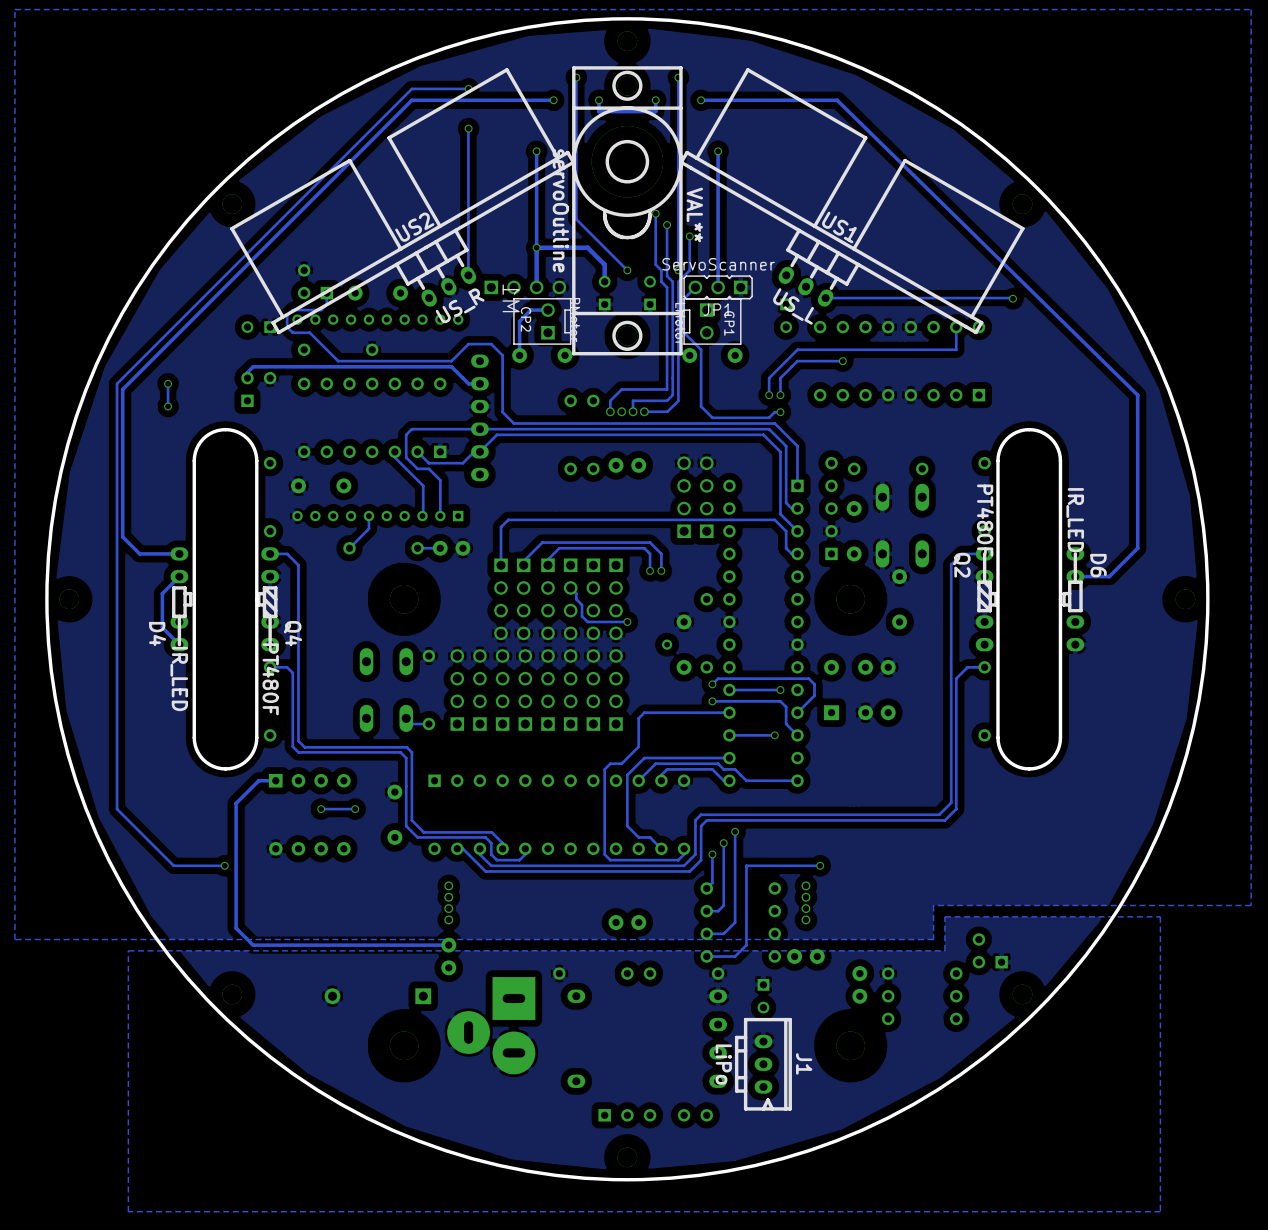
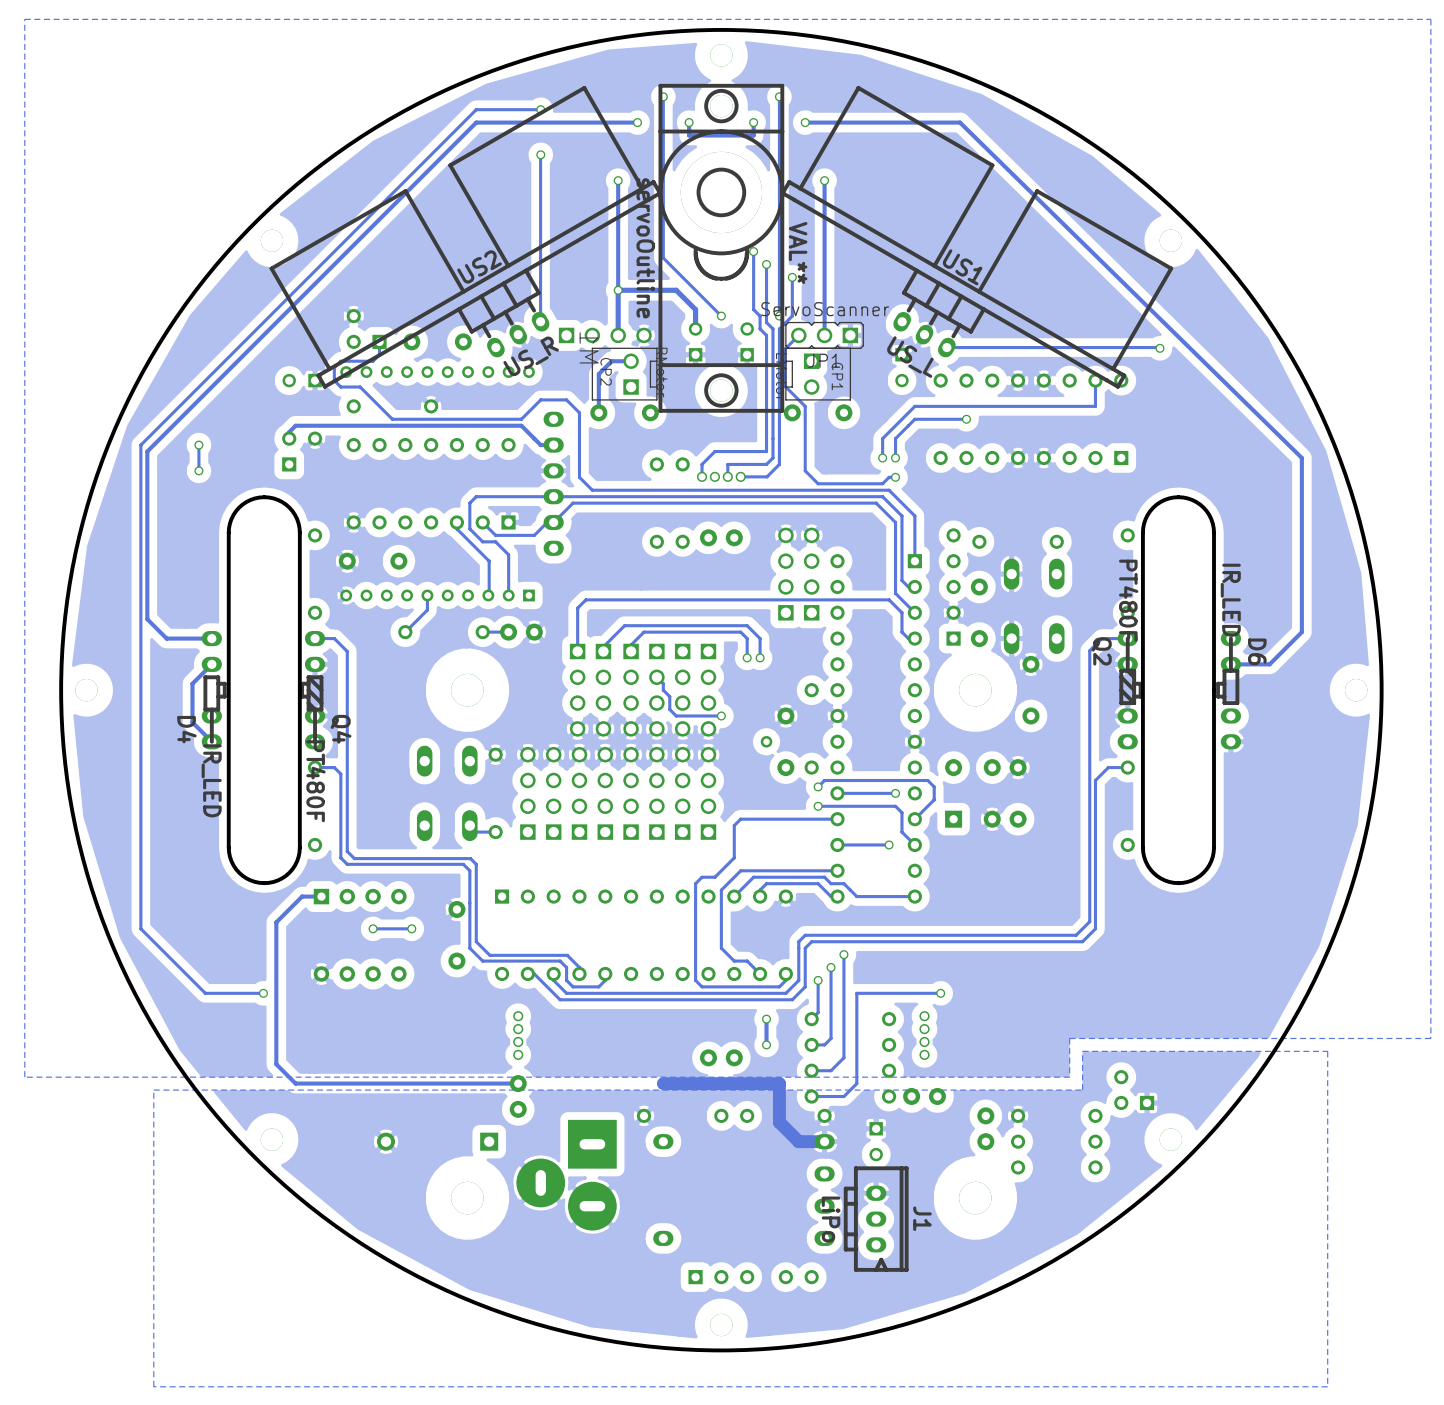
track: none -> (766, 1019) (766, 1044)
via: none -> (766, 1019)
via: none -> (766, 1044)
track: none -> (663, 1083) (779, 1083) (779, 1122) (798, 1141) (824, 1141)

